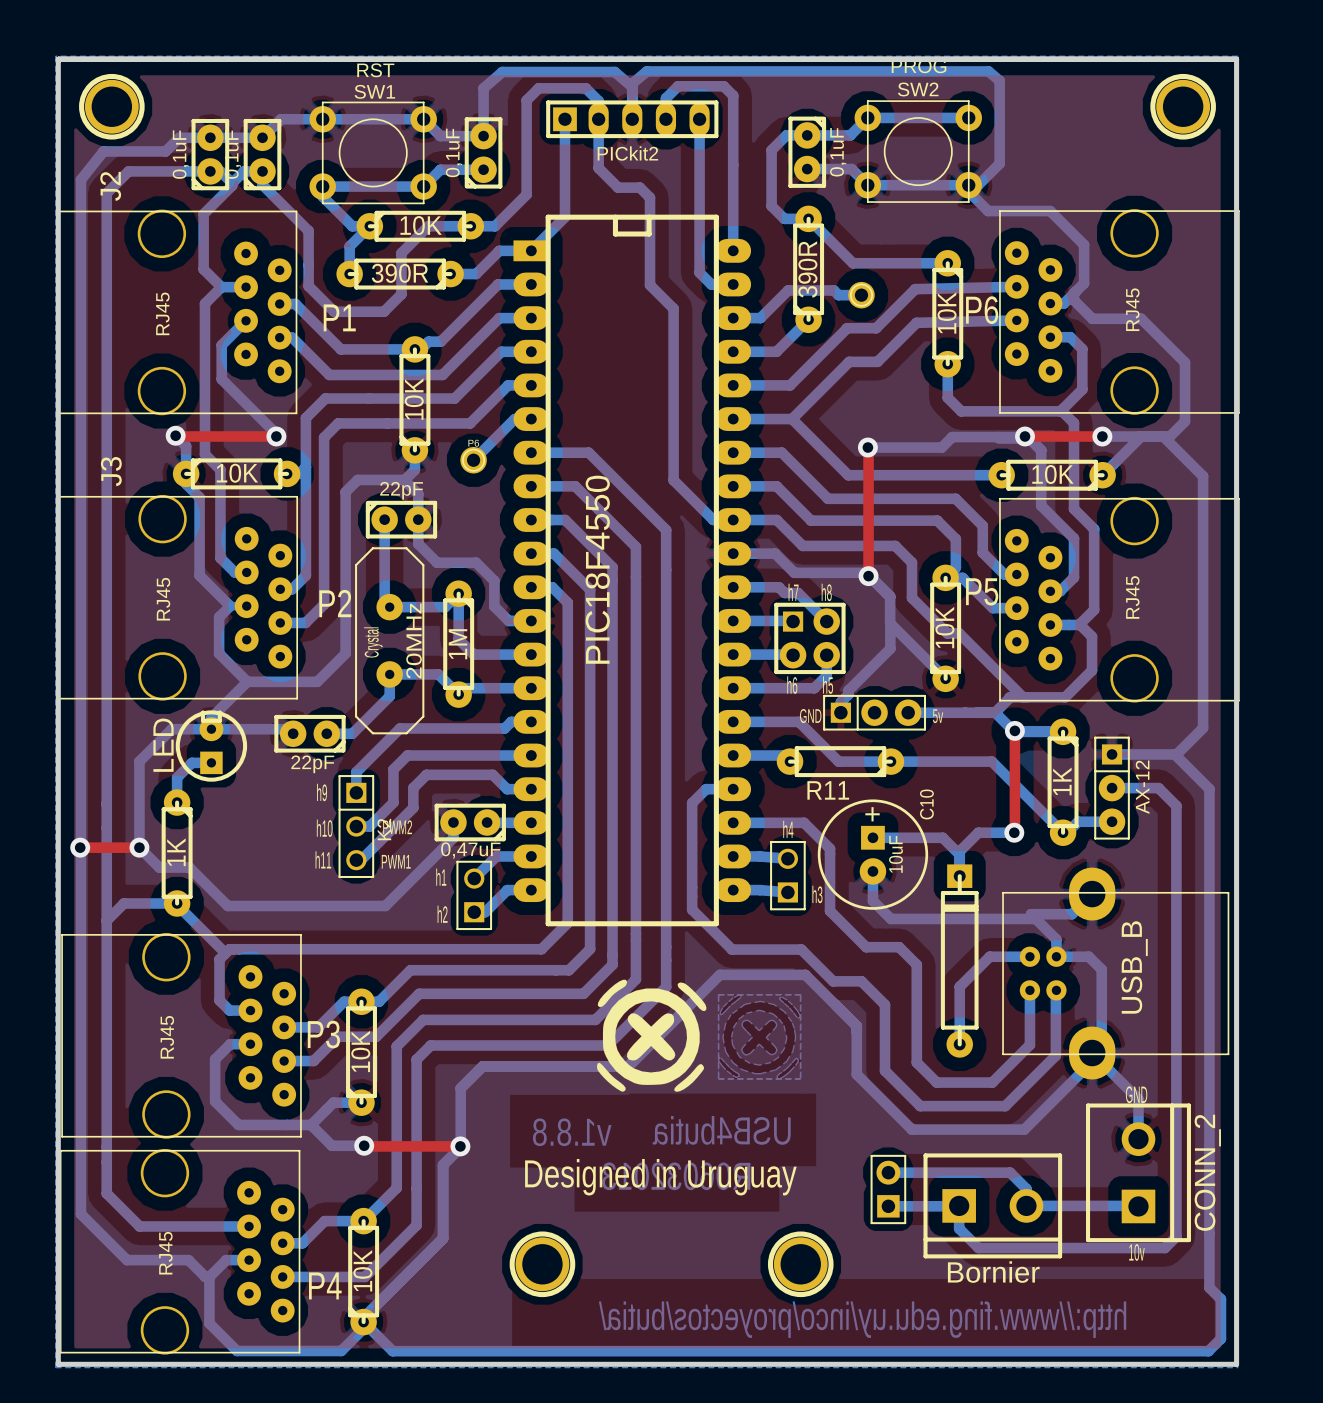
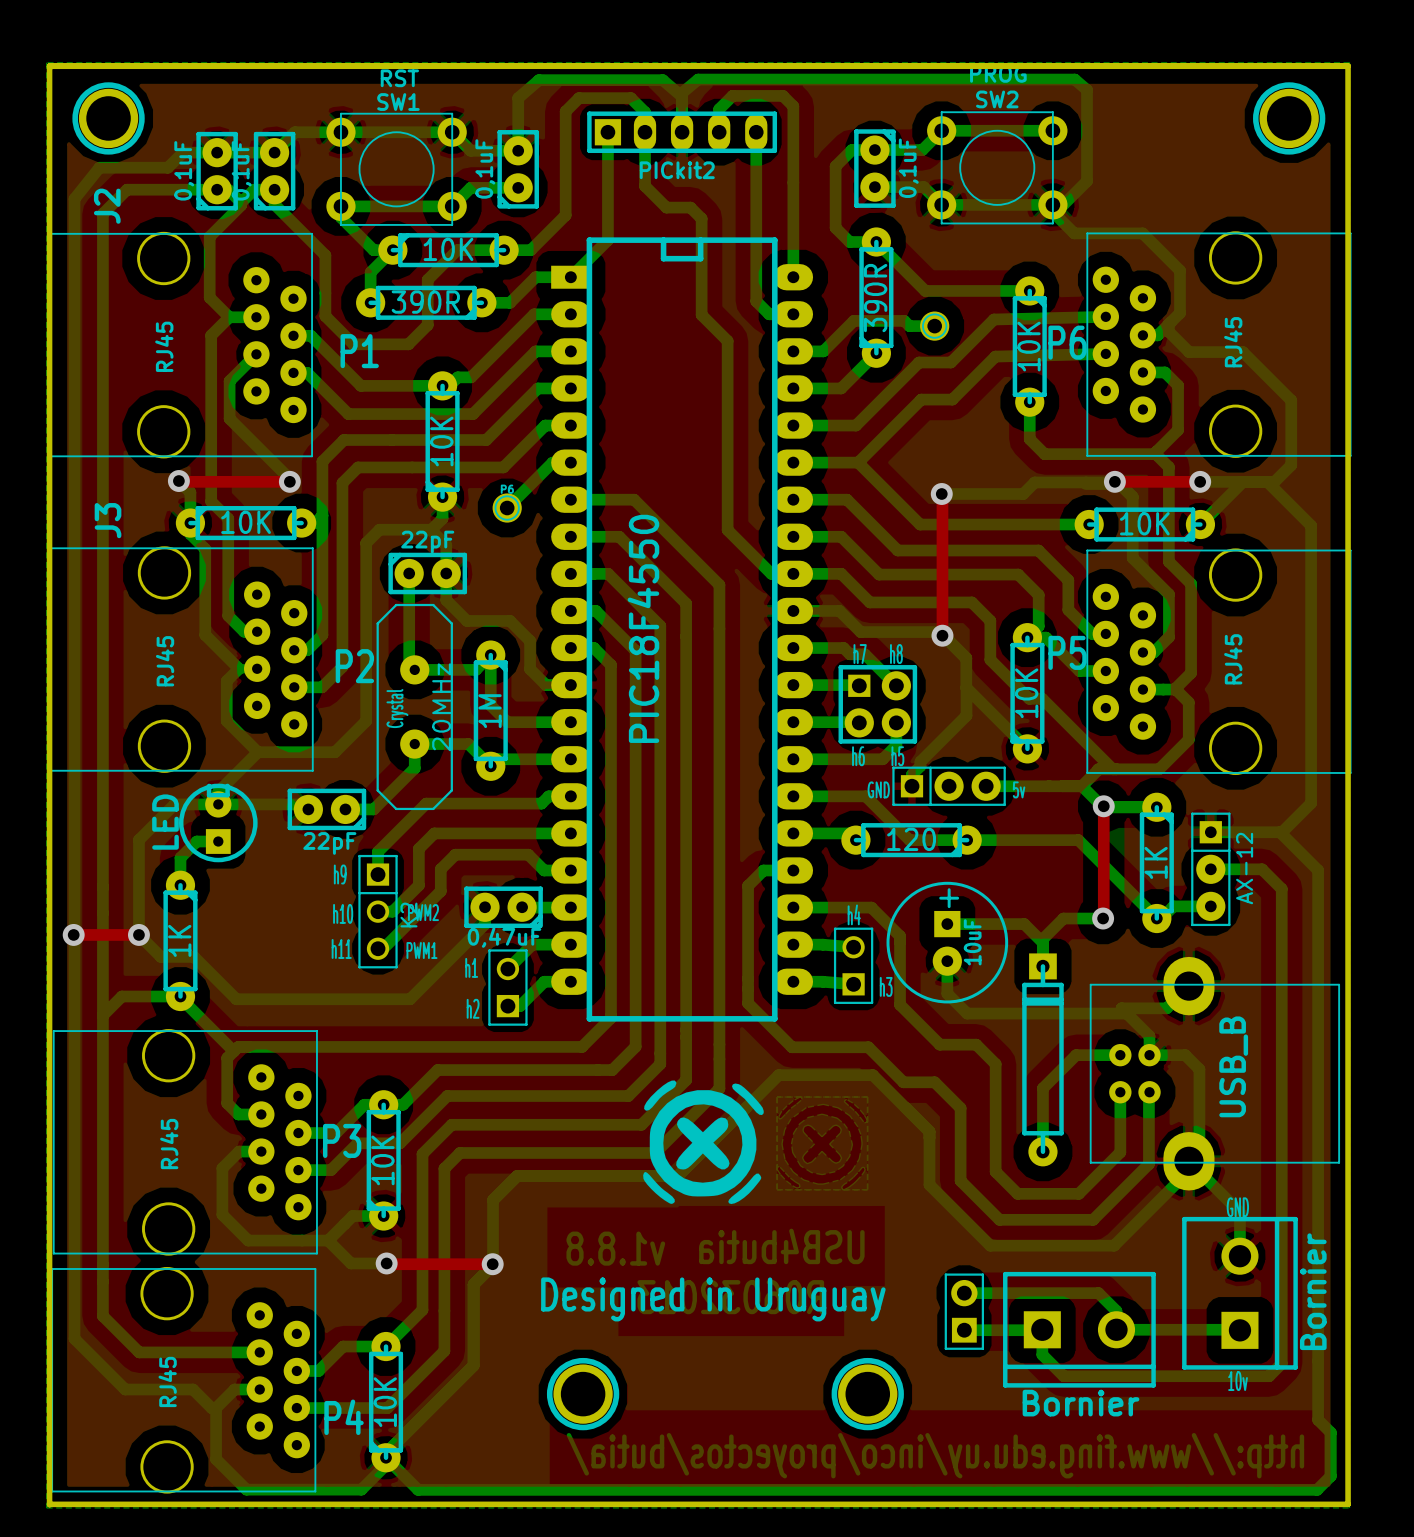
R11 value: none -> 120 (911, 839)
R11 name: R11 (828, 790) -> none
C10 name: C10 (926, 804) -> none
part value: CONN_2 (1207, 1172) -> Bornier (1313, 1291)

